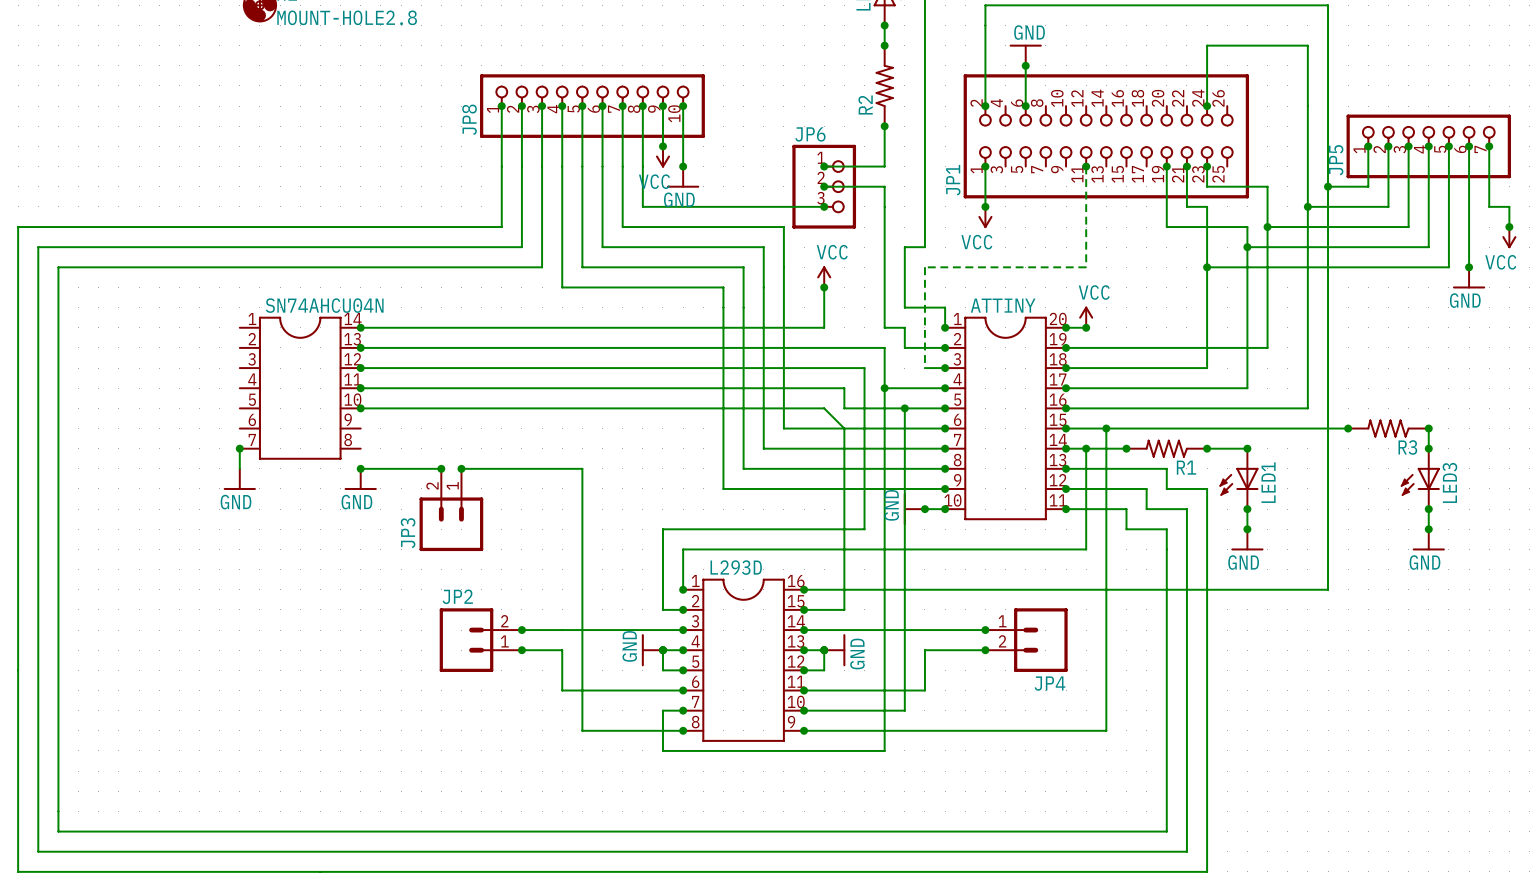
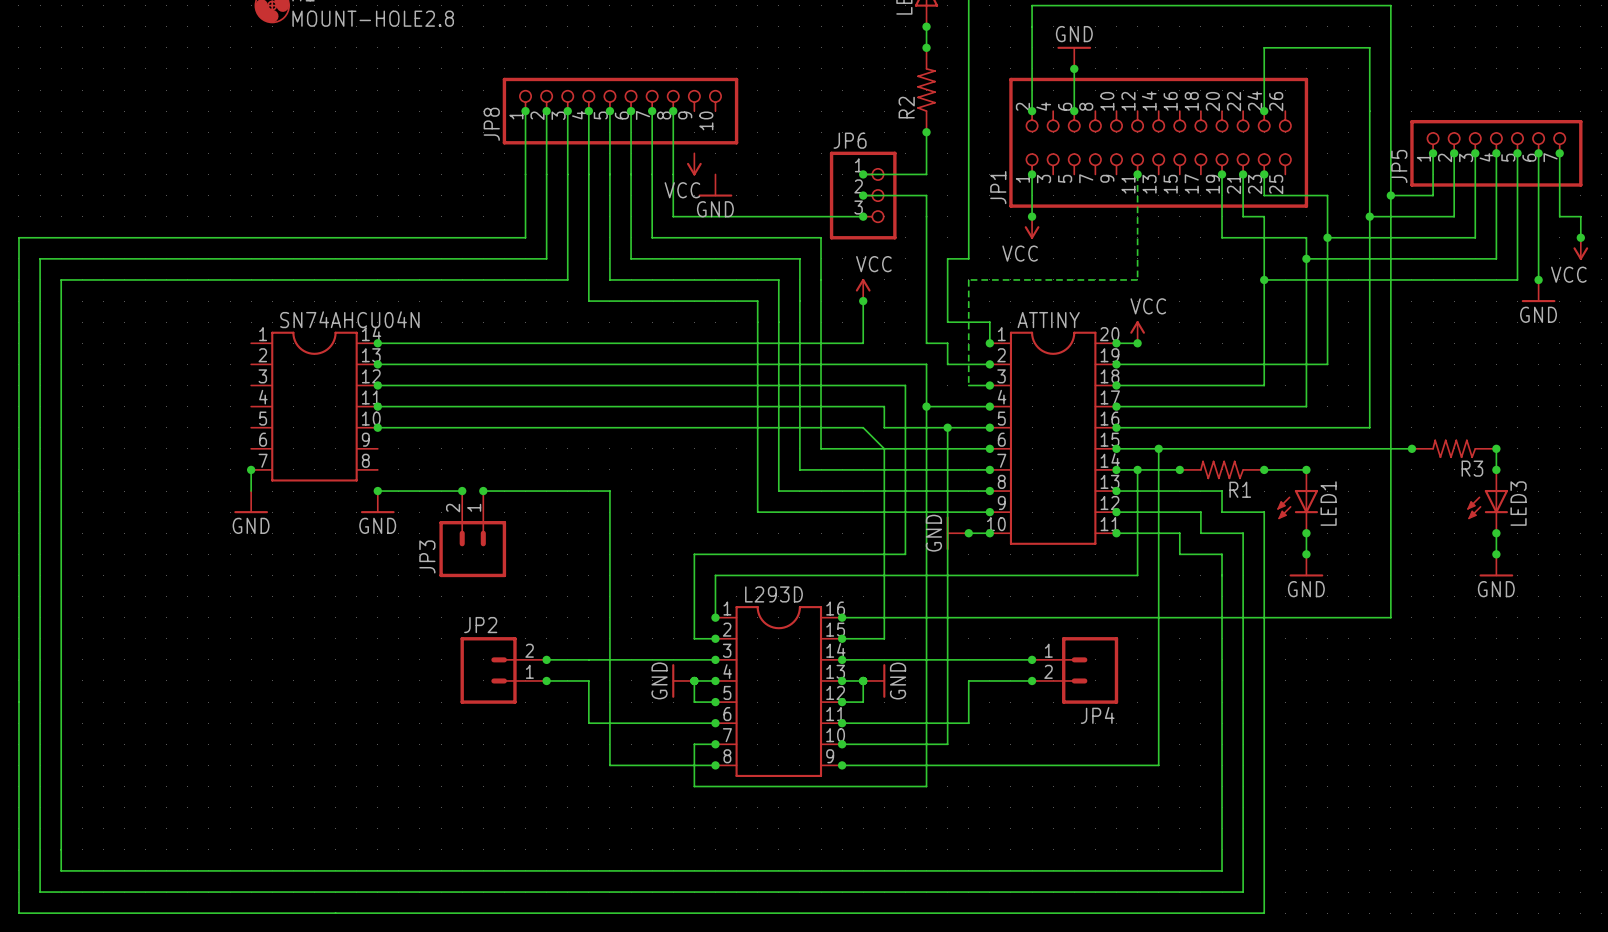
wire: (662, 106) (662, 146) -> none
junction: (662, 106) -> none
wire: (683, 106) (683, 166) -> none
junction: (683, 106) -> none
junction: (662, 146) -> none
junction: (683, 166) -> none

